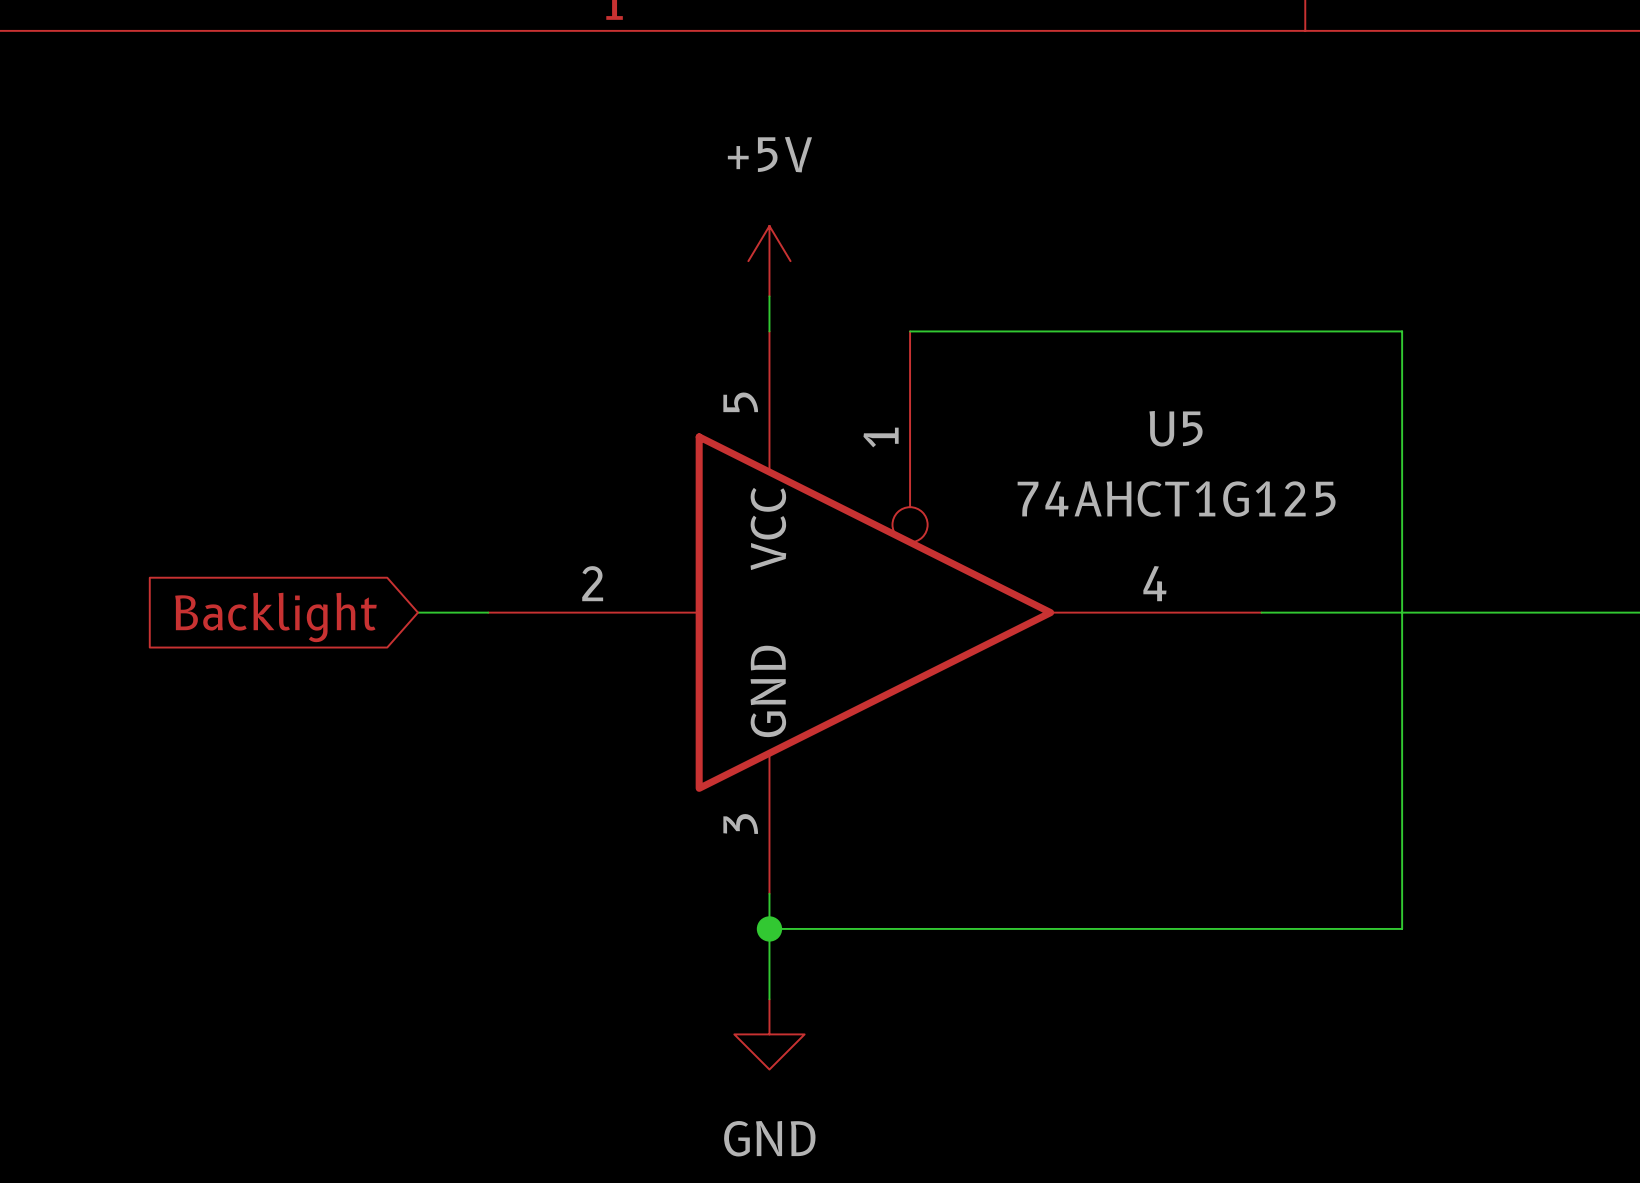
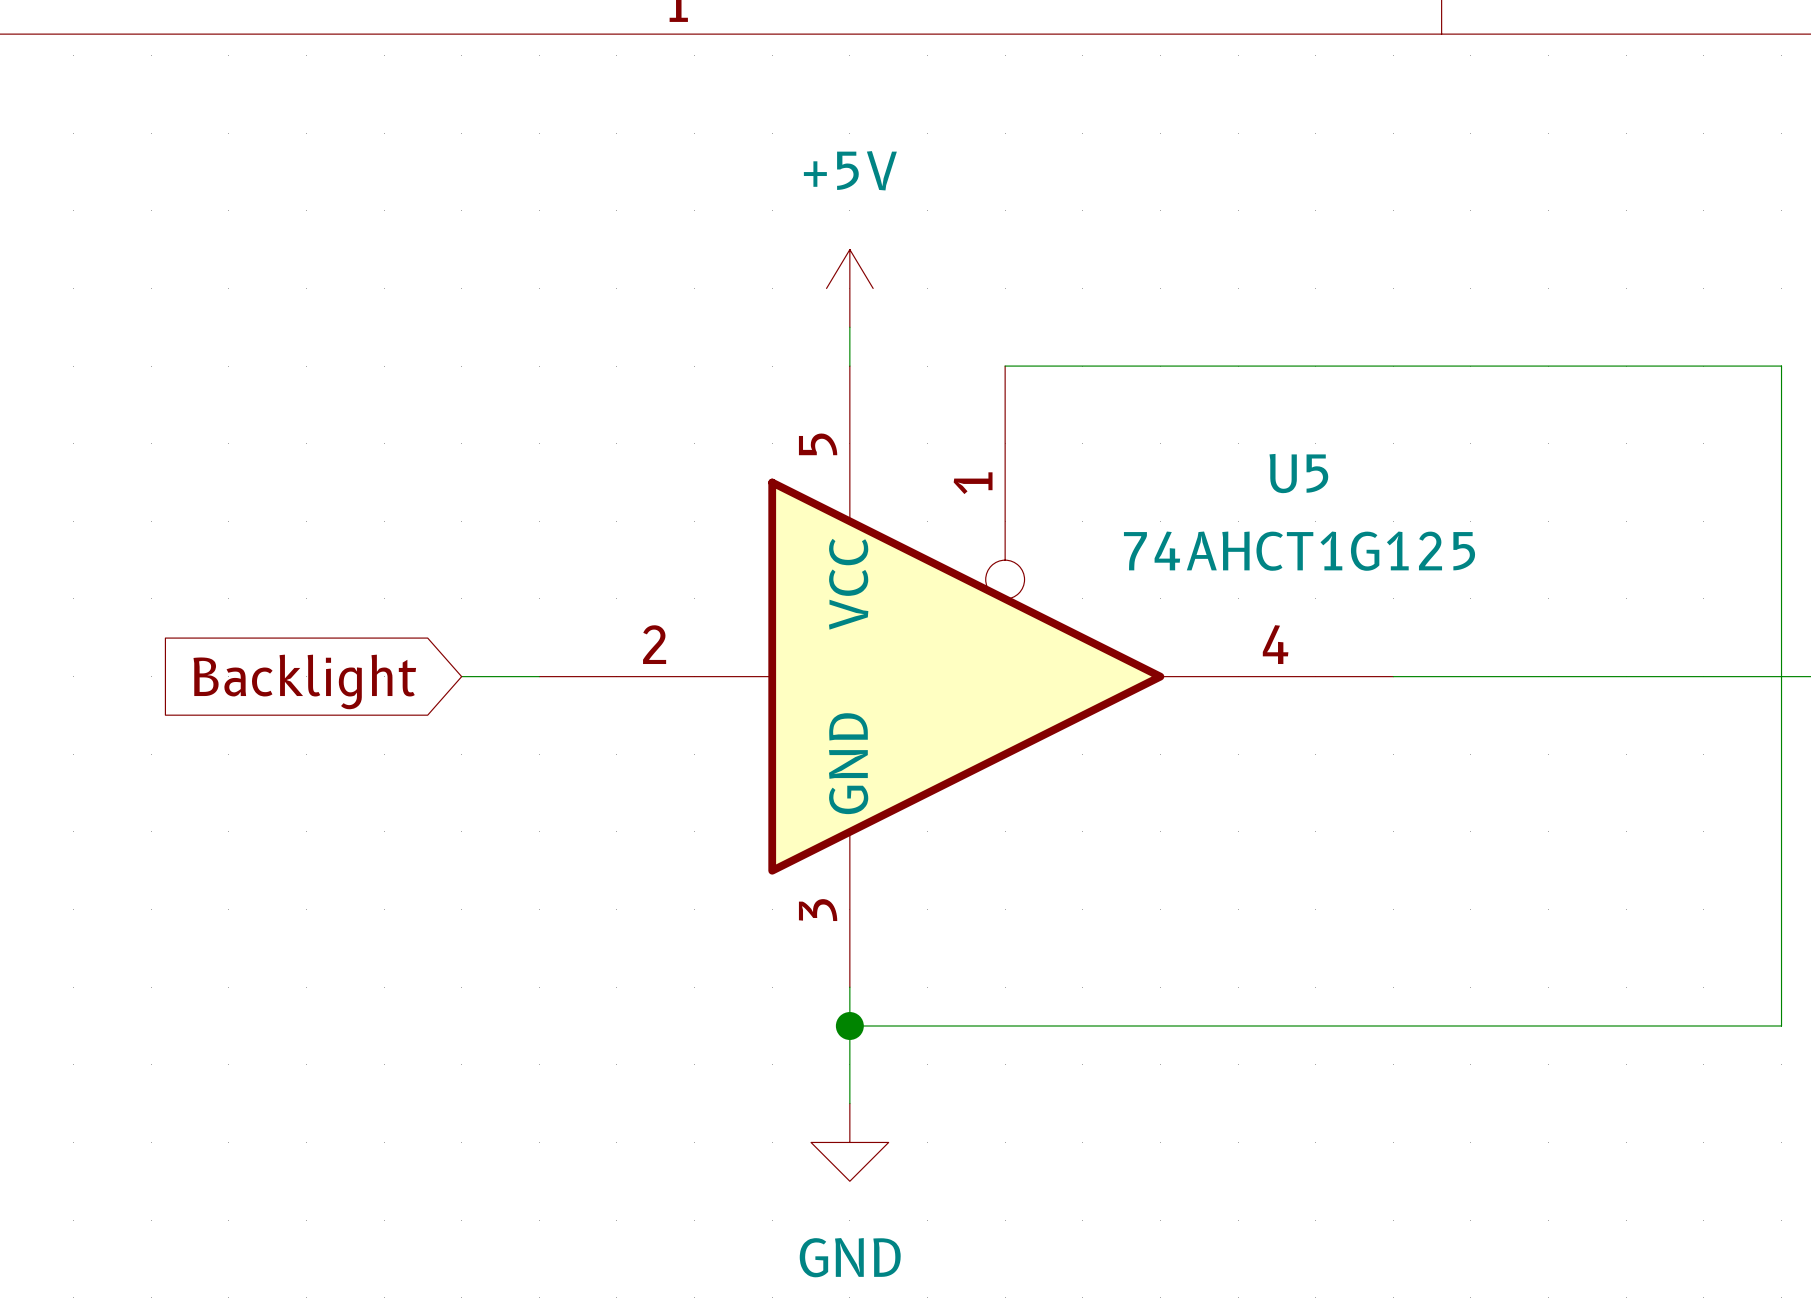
wire: (1402, 331) (1402, 928) -> (1548, 366) (1781, 366) (1781, 1026) (1548, 1026)

